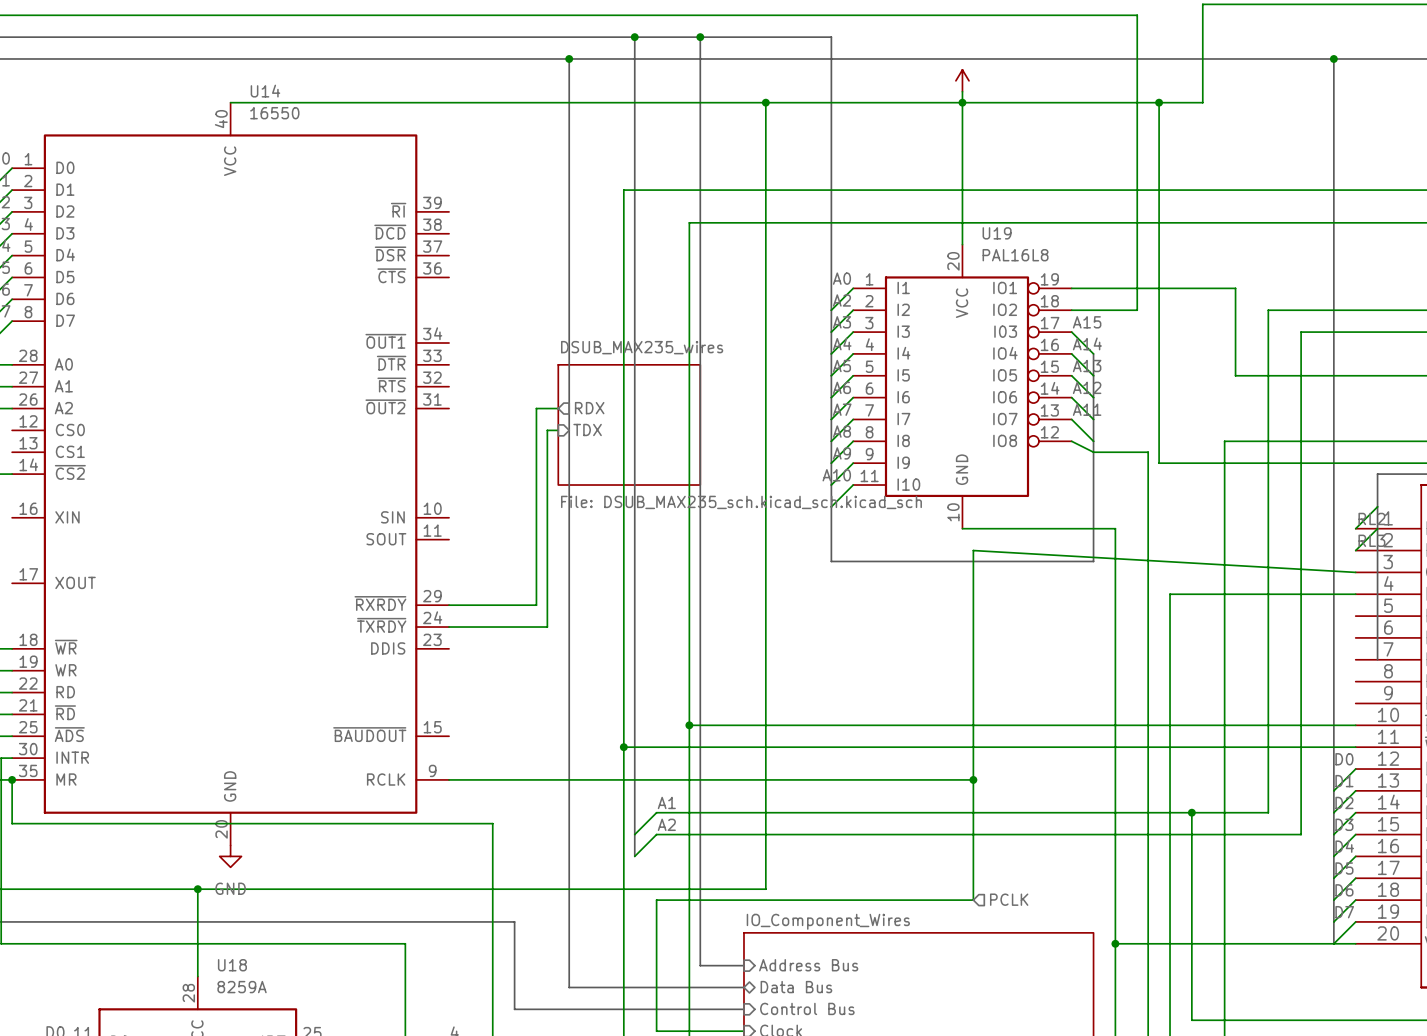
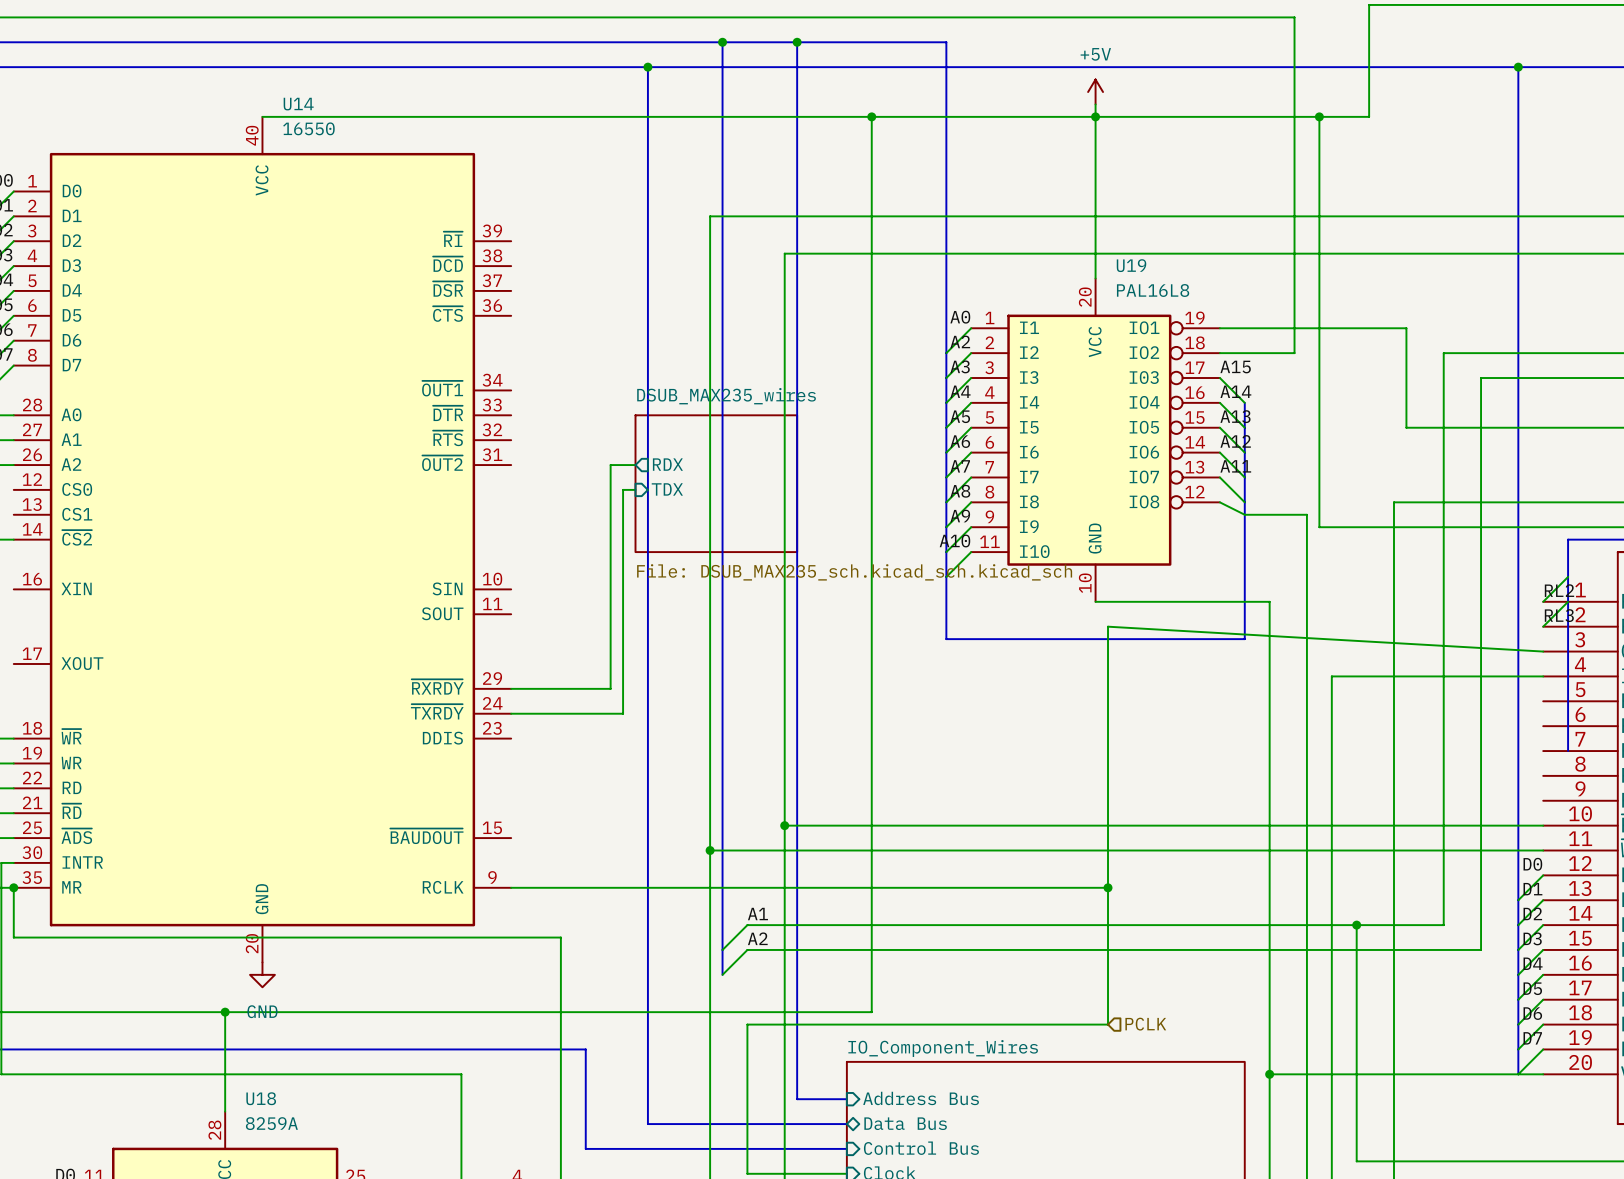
power symbol text: none -> +5V (1095, 54)

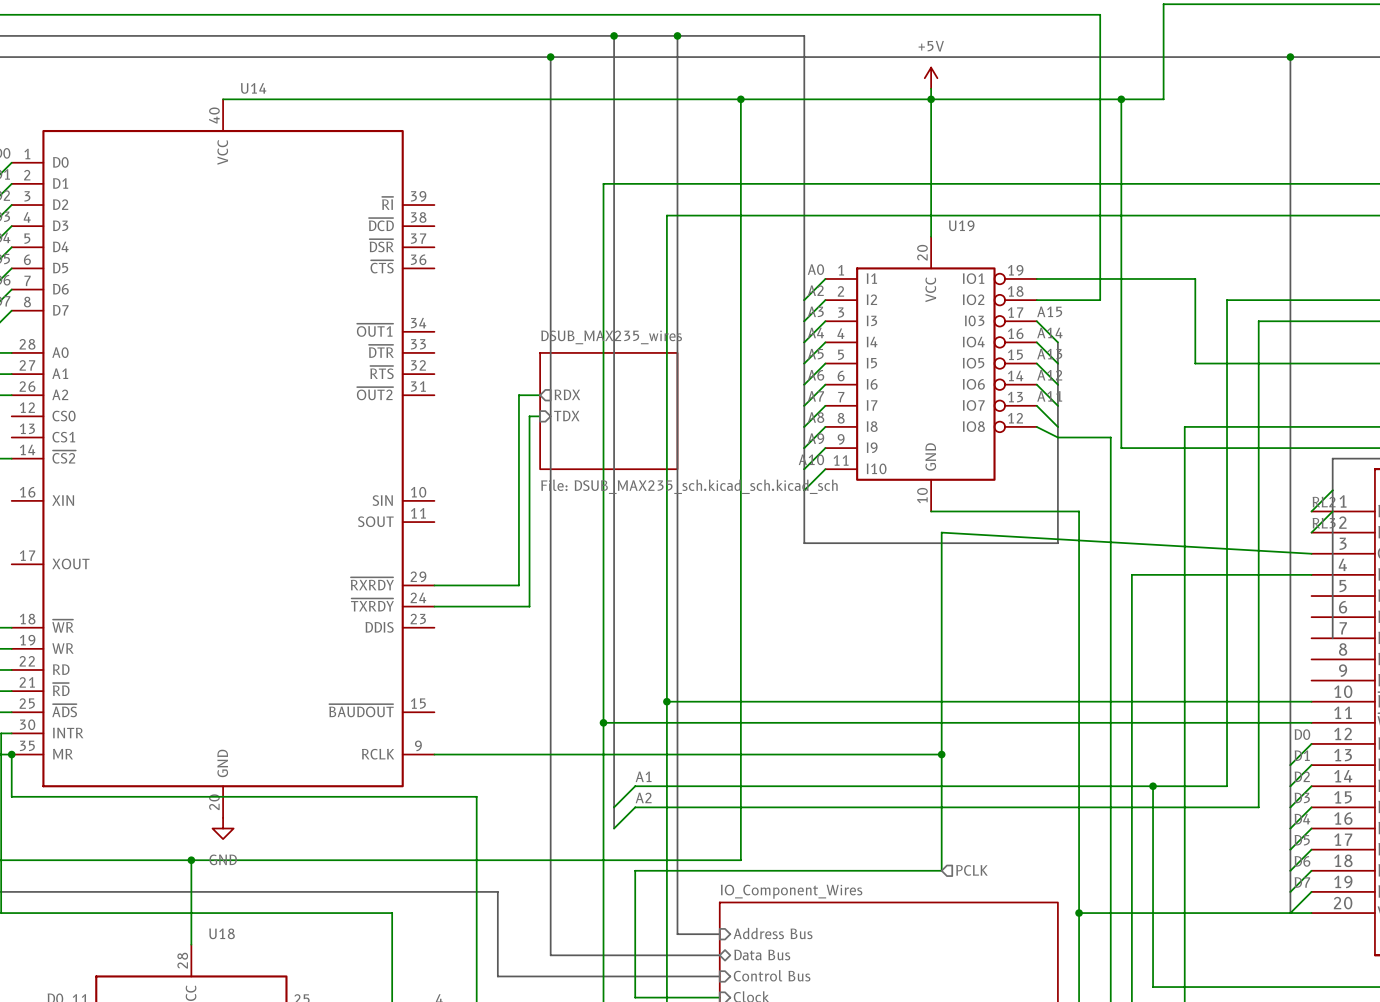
U14 value: 16550 (308, 128) -> none
U19 value: PAL16L8 (1153, 290) -> none
U18 value: 8259A (271, 1123) -> none

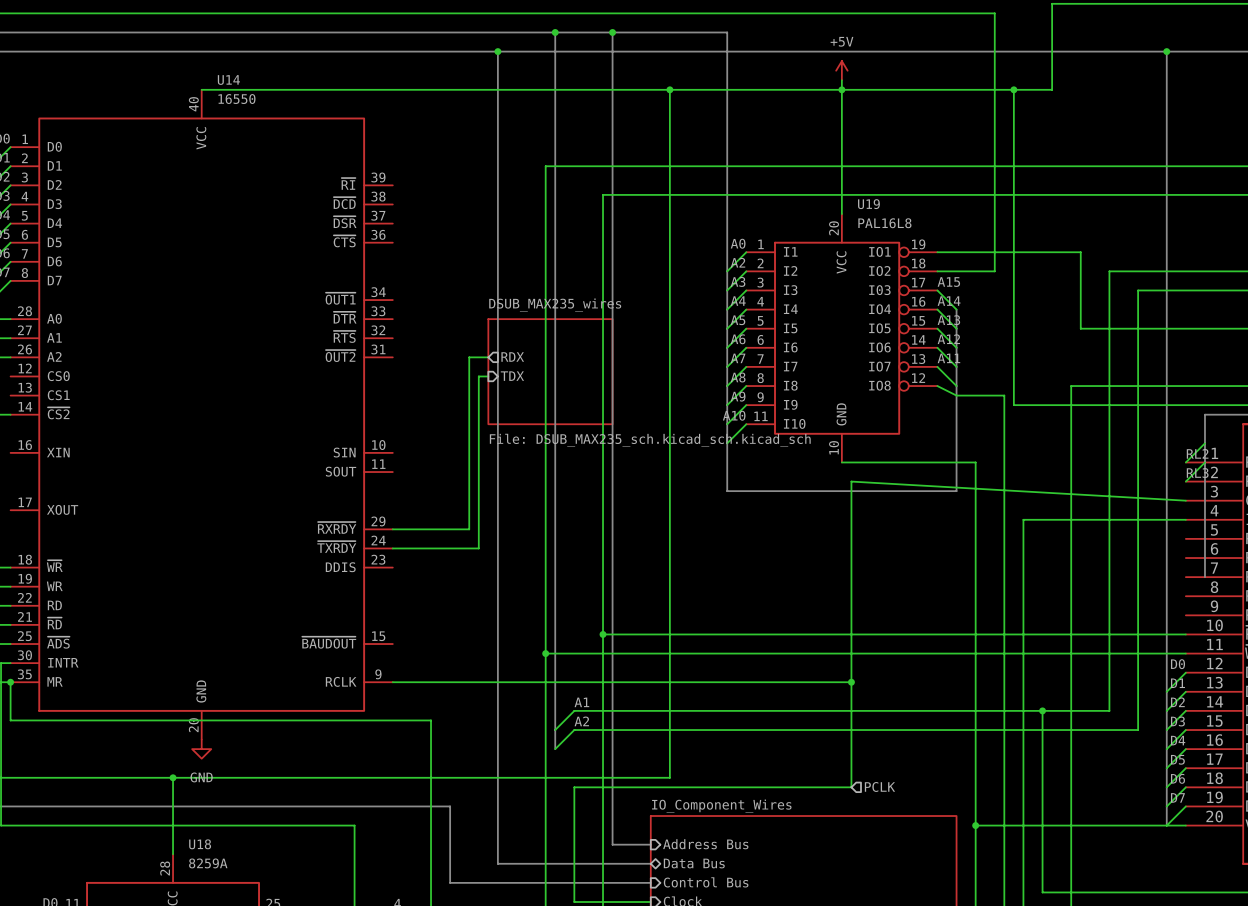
U14 value: none -> 16550 (236, 99)
U19 value: none -> PAL16L8 (884, 223)
U18 value: none -> 8259A (208, 863)

